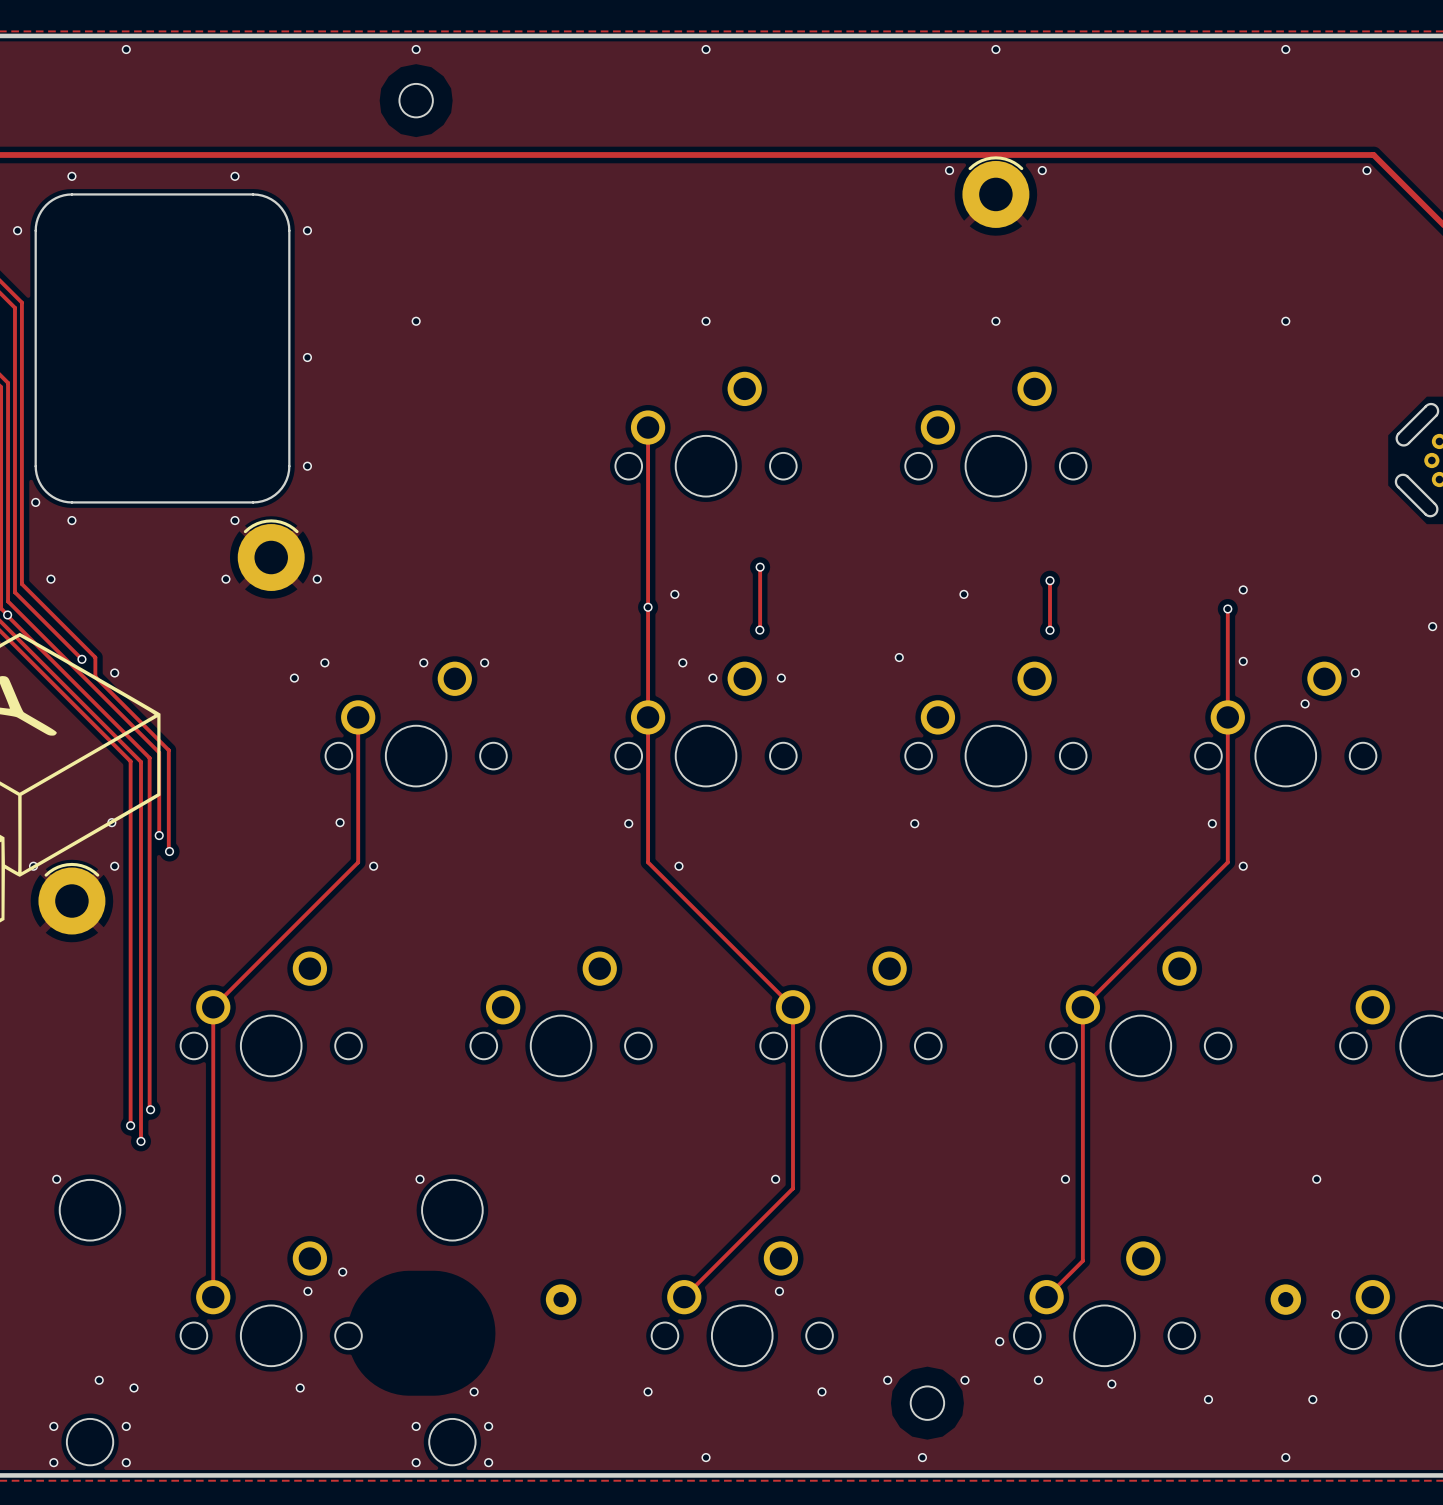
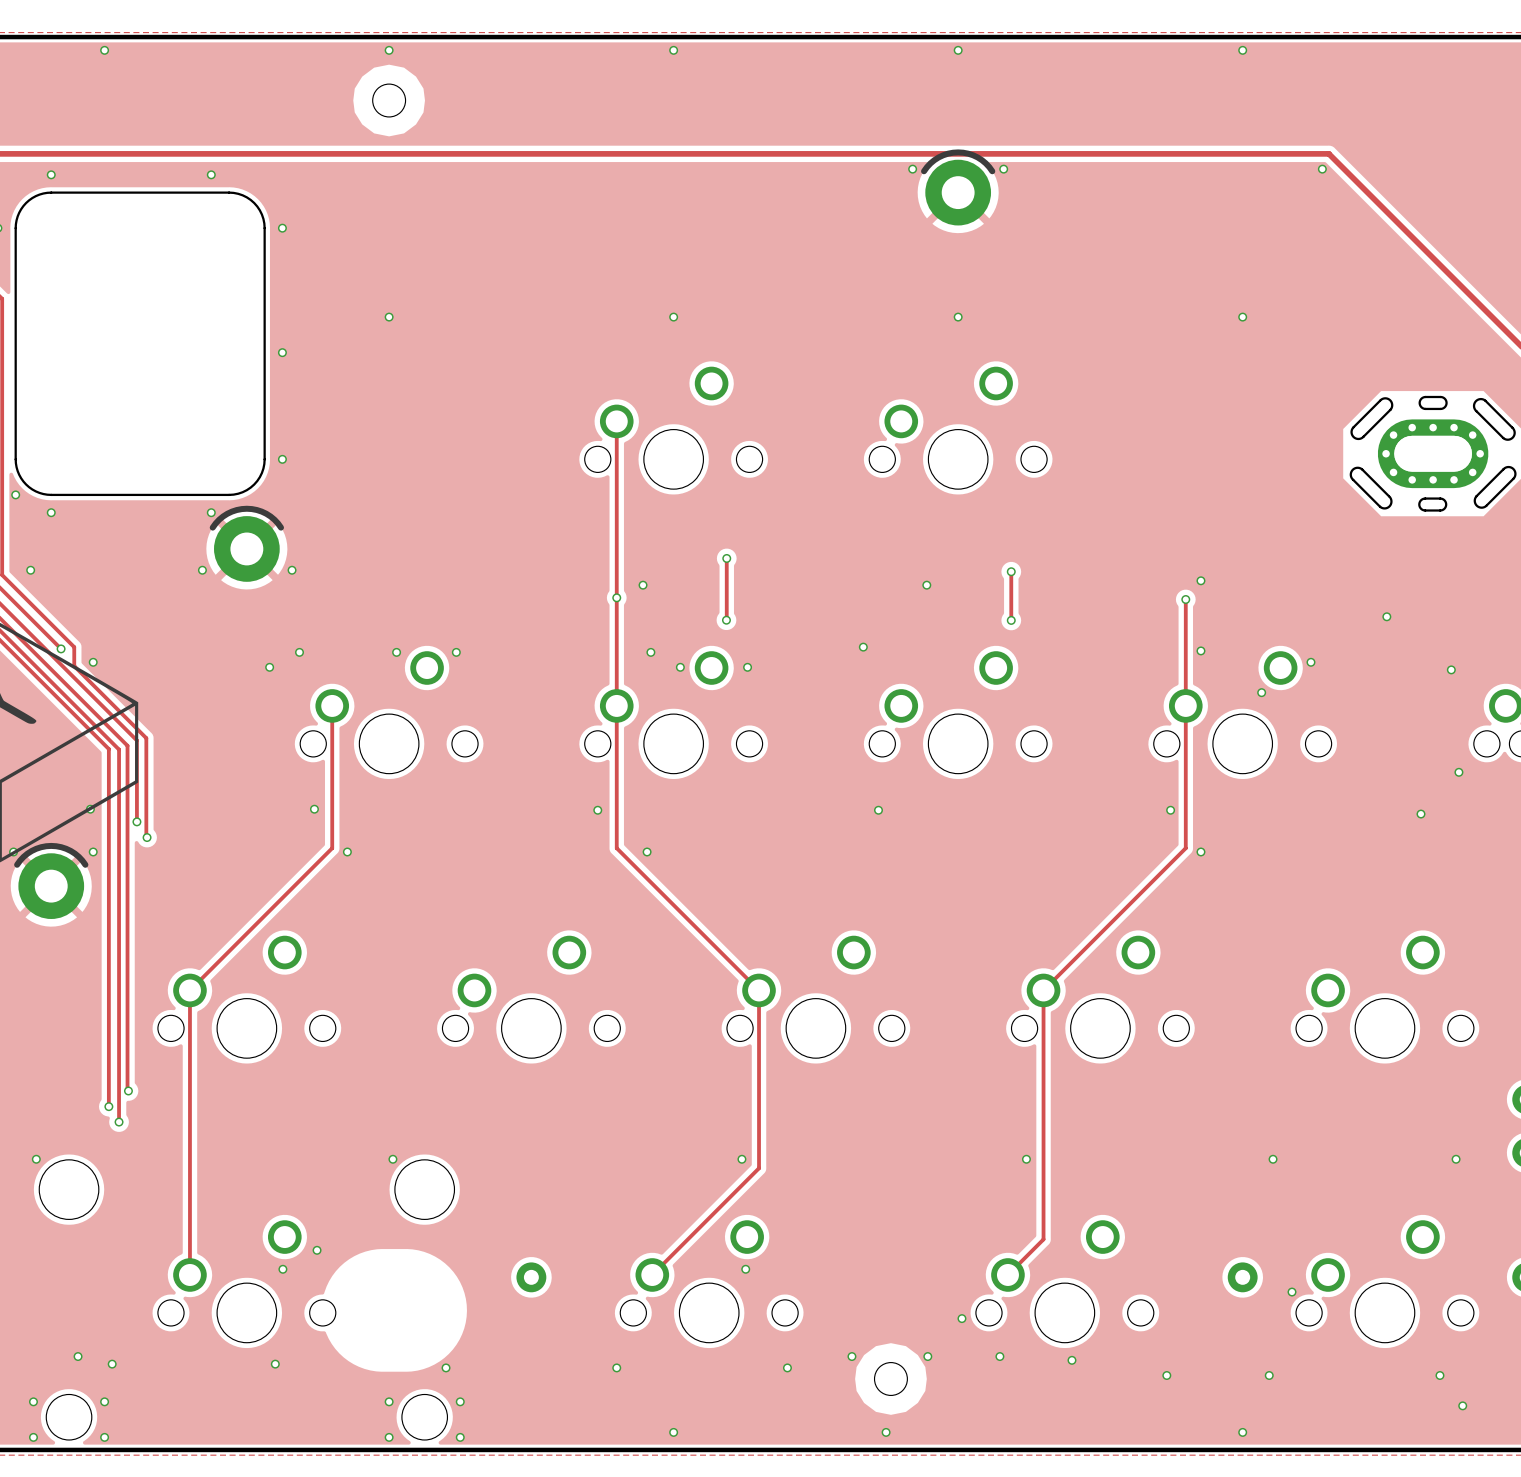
part footprint: [962, 156, 1030, 228] -> [921, 149, 996, 226]
part footprint: [237, 519, 305, 591] -> [209, 505, 284, 582]
part footprint: [38, 862, 106, 935] -> [14, 842, 89, 919]

